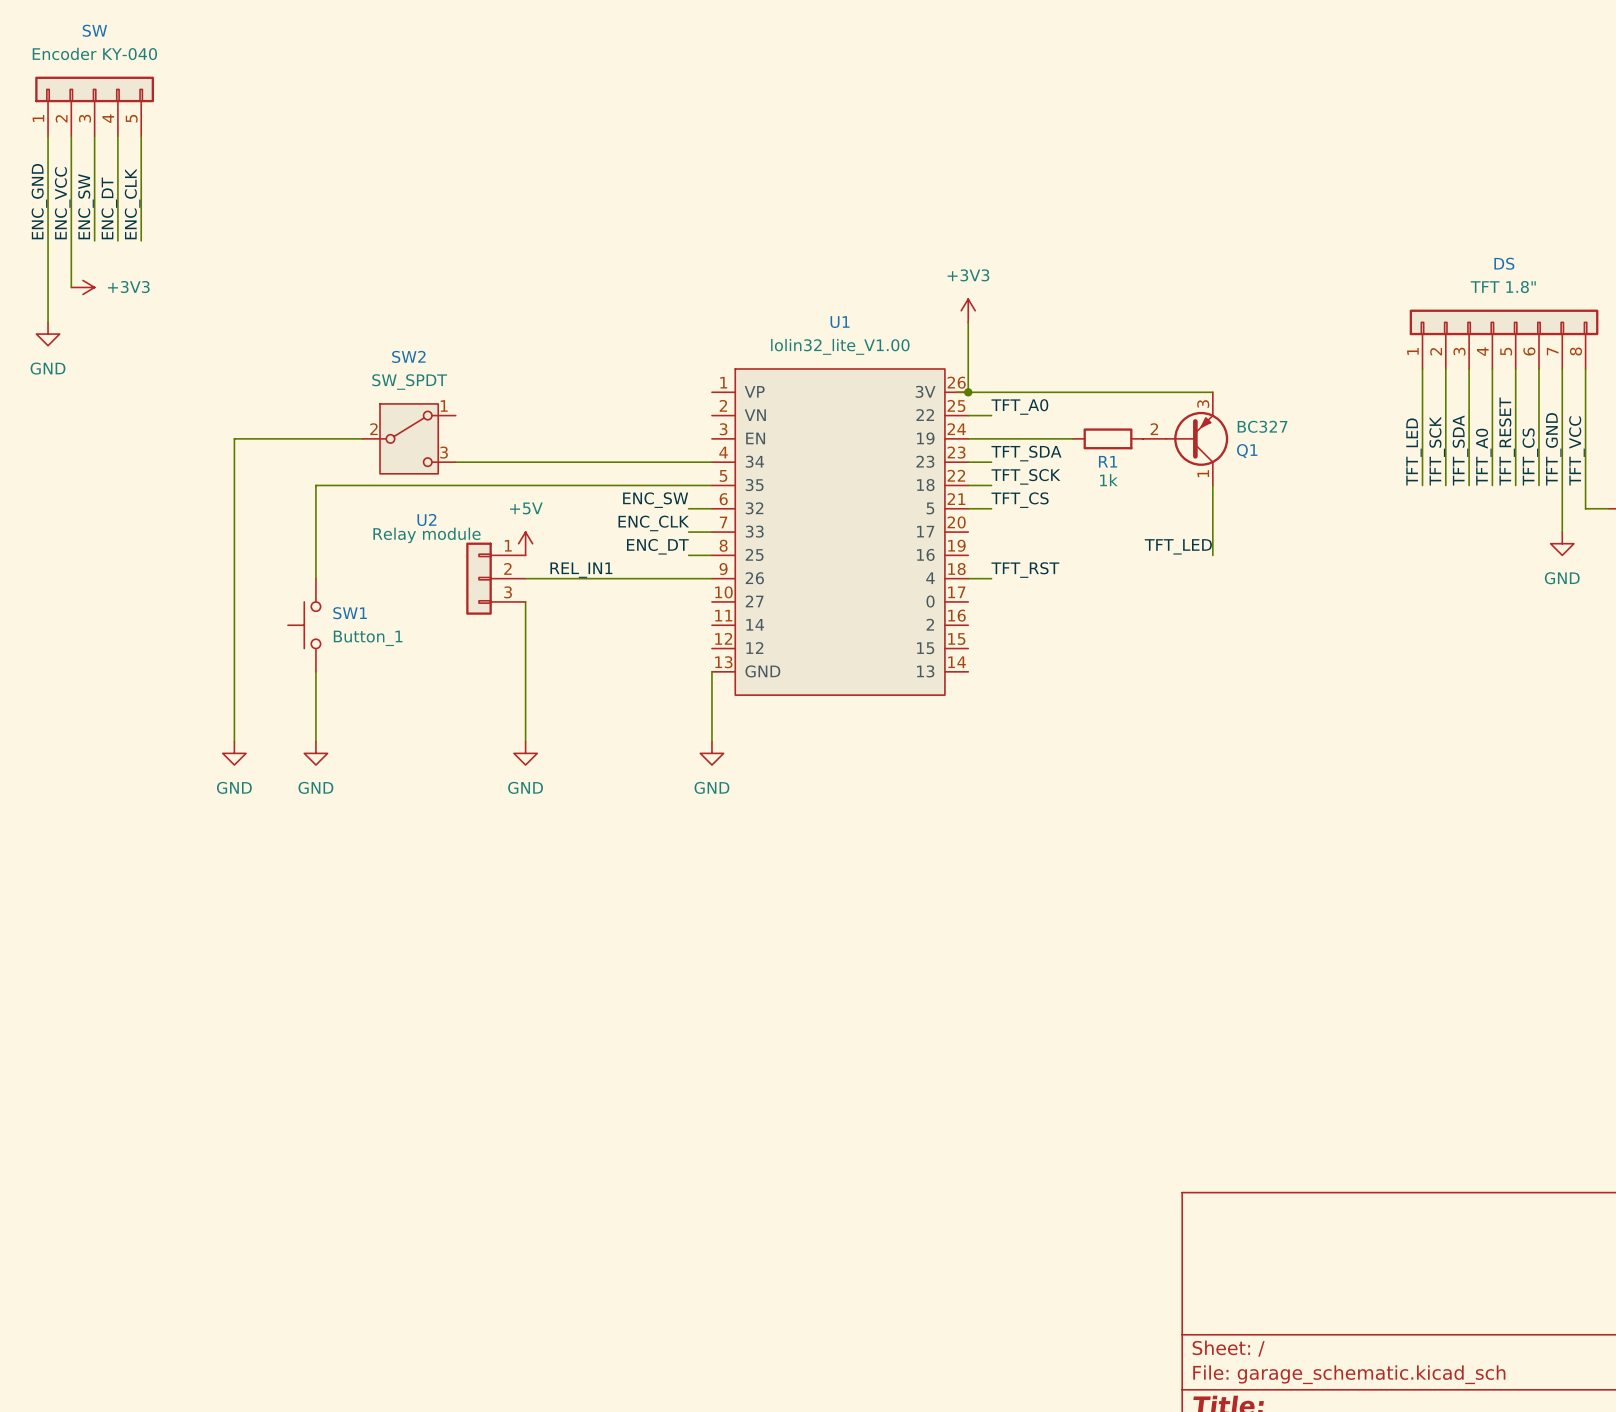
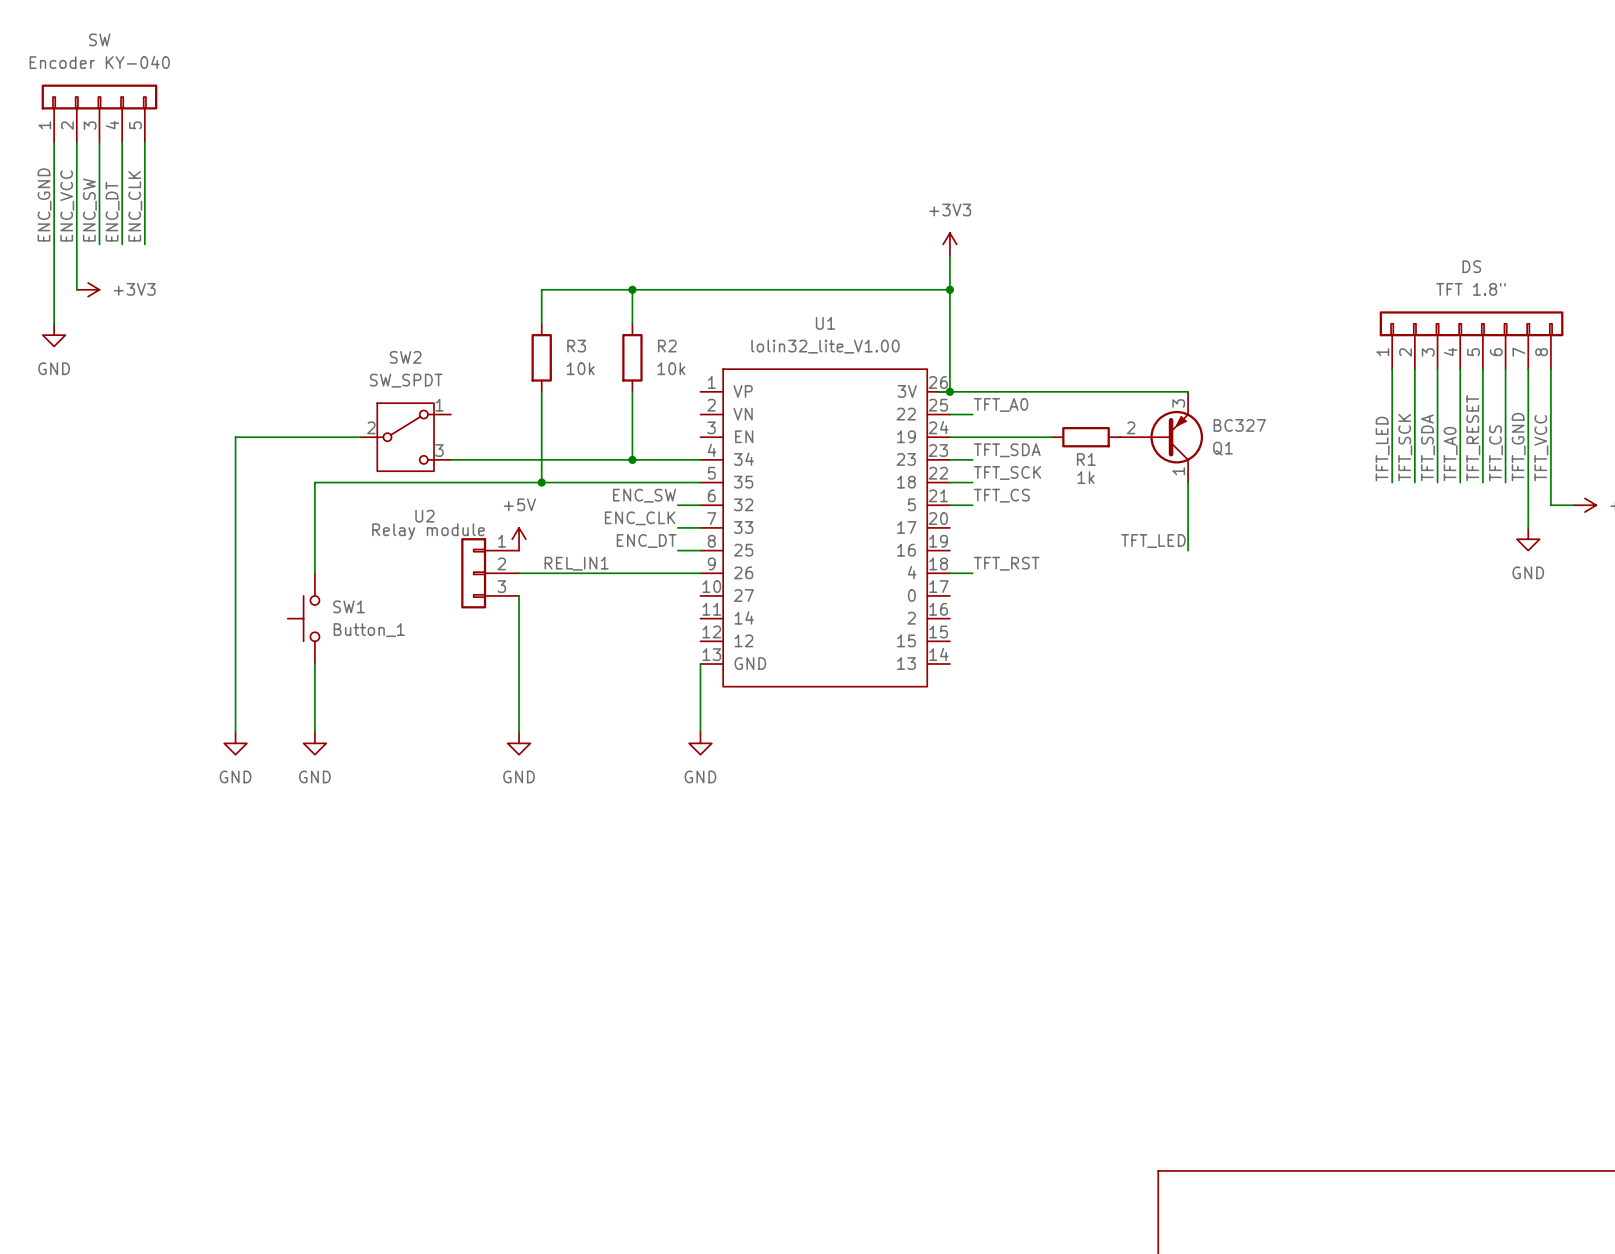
wire: none -> (949, 255) (949, 323)
wire: none -> (632, 289) (632, 323)
junction: none -> (632, 289)
wire: none -> (949, 289) (541, 289) (541, 323)
junction: none -> (949, 289)
power symbol position: +3V3 (968, 310) -> +3V3 (949, 244)
R3: none -> 10k (541, 357)
R2: none -> 10k (632, 357)
wire: none -> (541, 391) (541, 482)
wire: none -> (632, 391) (632, 459)
junction: none -> (632, 459)
junction: none -> (541, 482)

